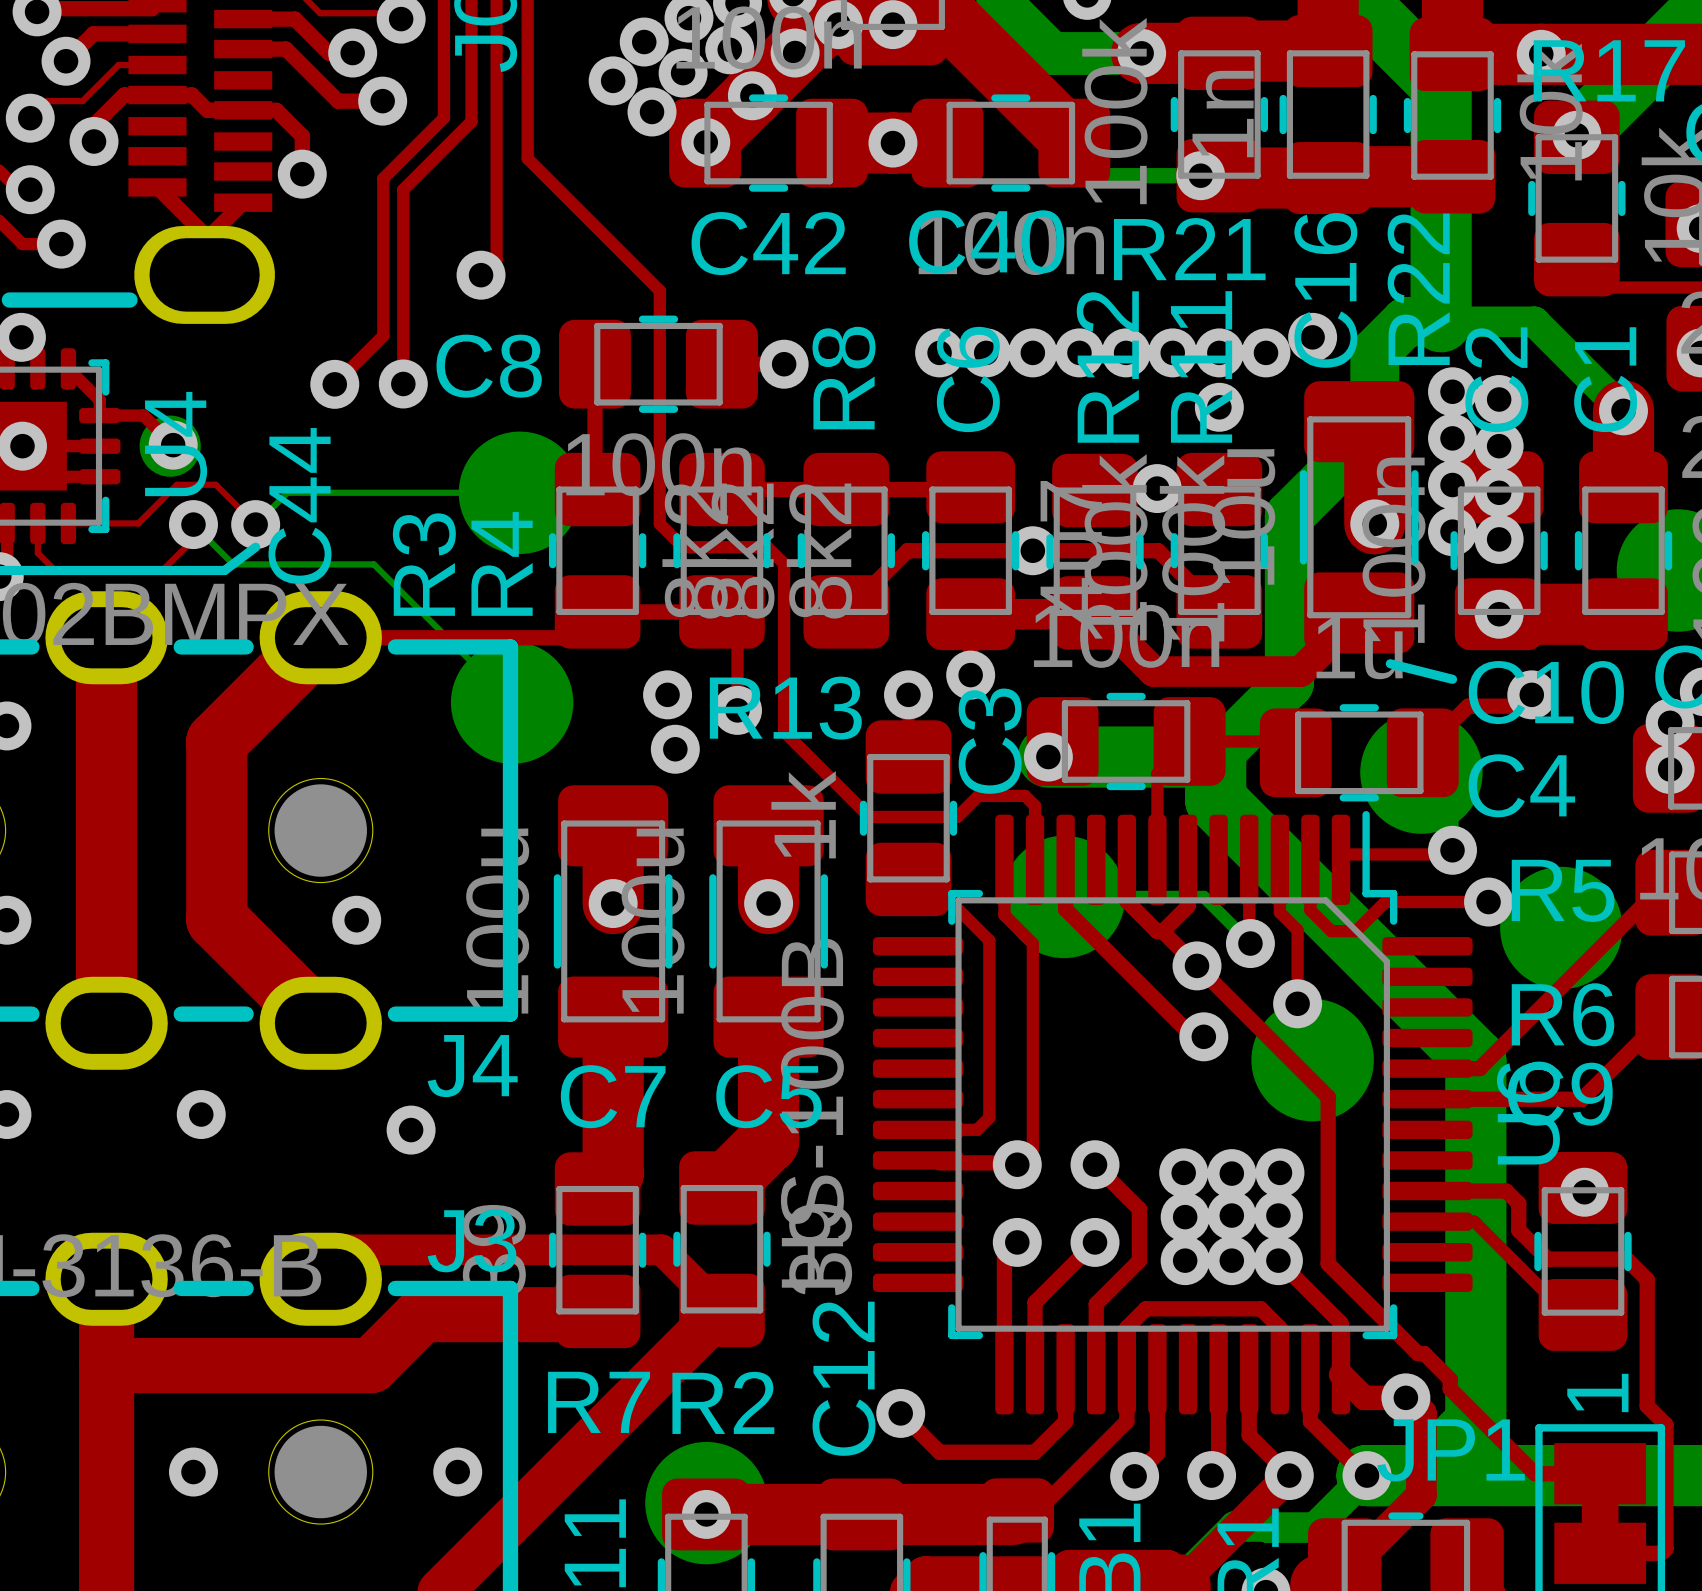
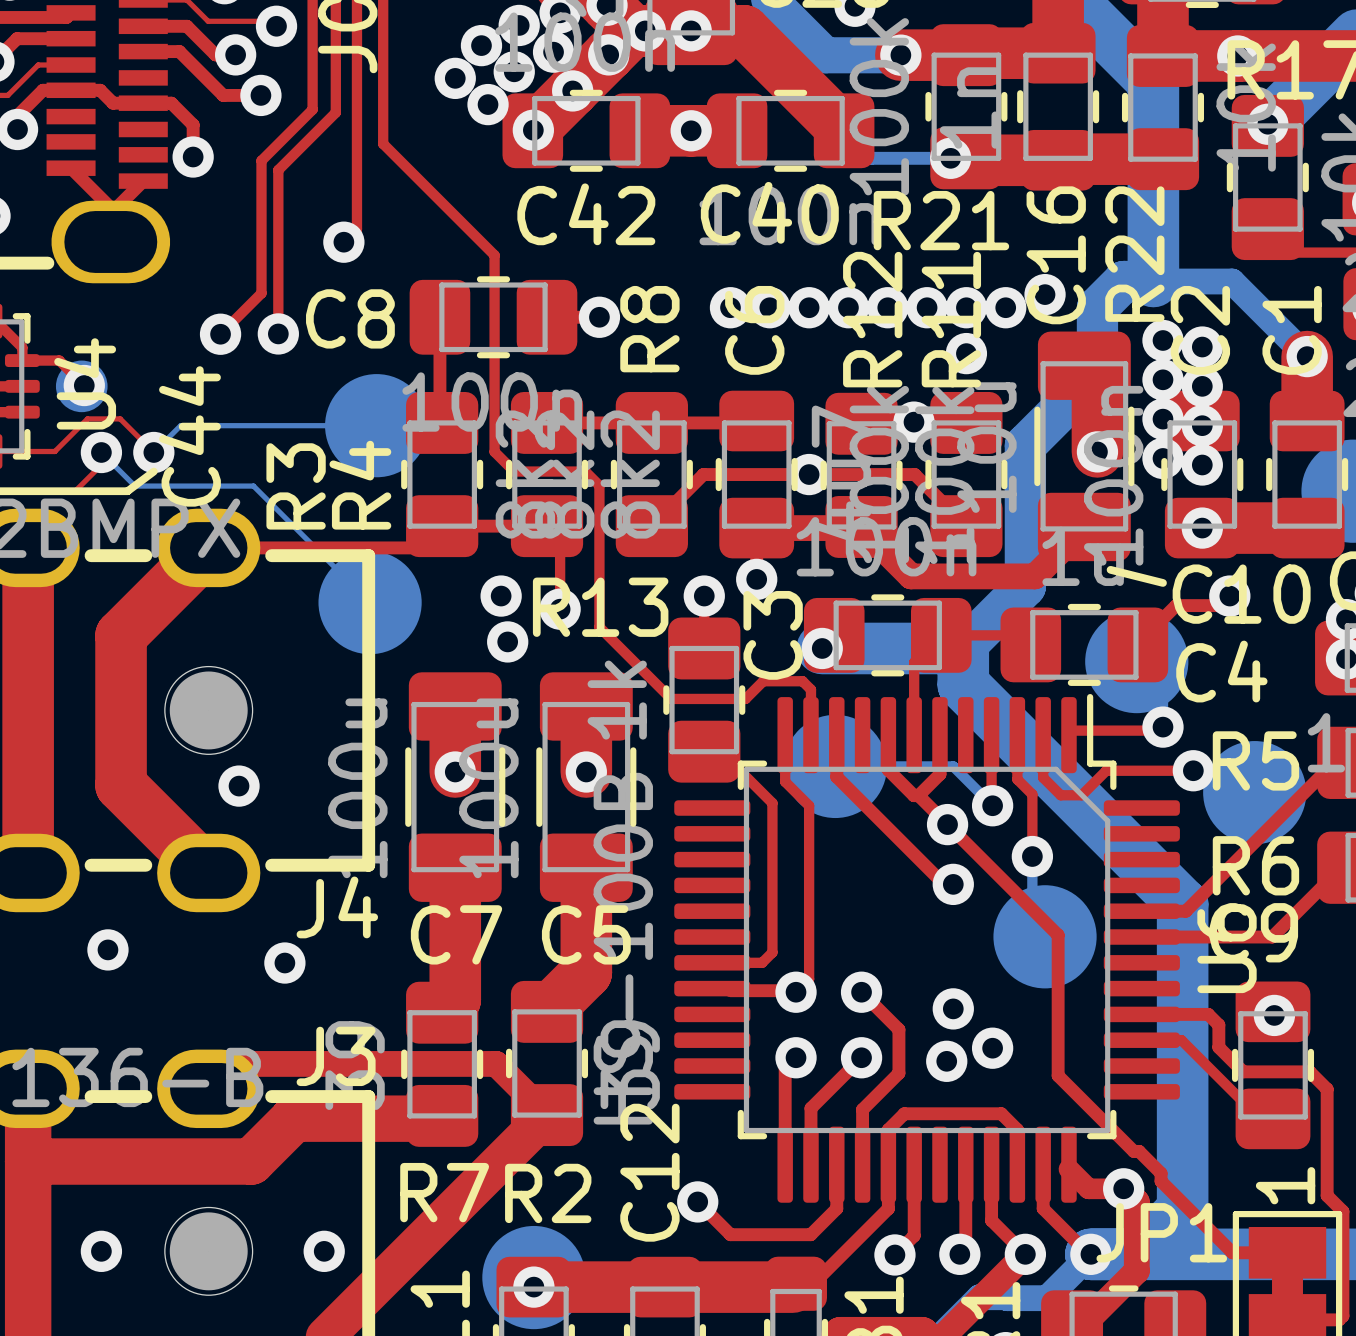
part position: (1312, 1060) -> (1045, 936)
via: (1183, 1172) -> none
via: (1279, 1172) -> none
via: (1231, 1173) -> none
via: none -> (953, 1008)
via: (1231, 1215) -> none
via: (1278, 1215) -> none
via: (1185, 1217) -> none
via: none -> (992, 1048)
via: none -> (946, 1061)
via: (1185, 1260) -> none
via: (1231, 1260) -> none
top track: (1278, 1260) (1341, 1323) (1341, 1369) -> none
via: (1278, 1260) -> none

